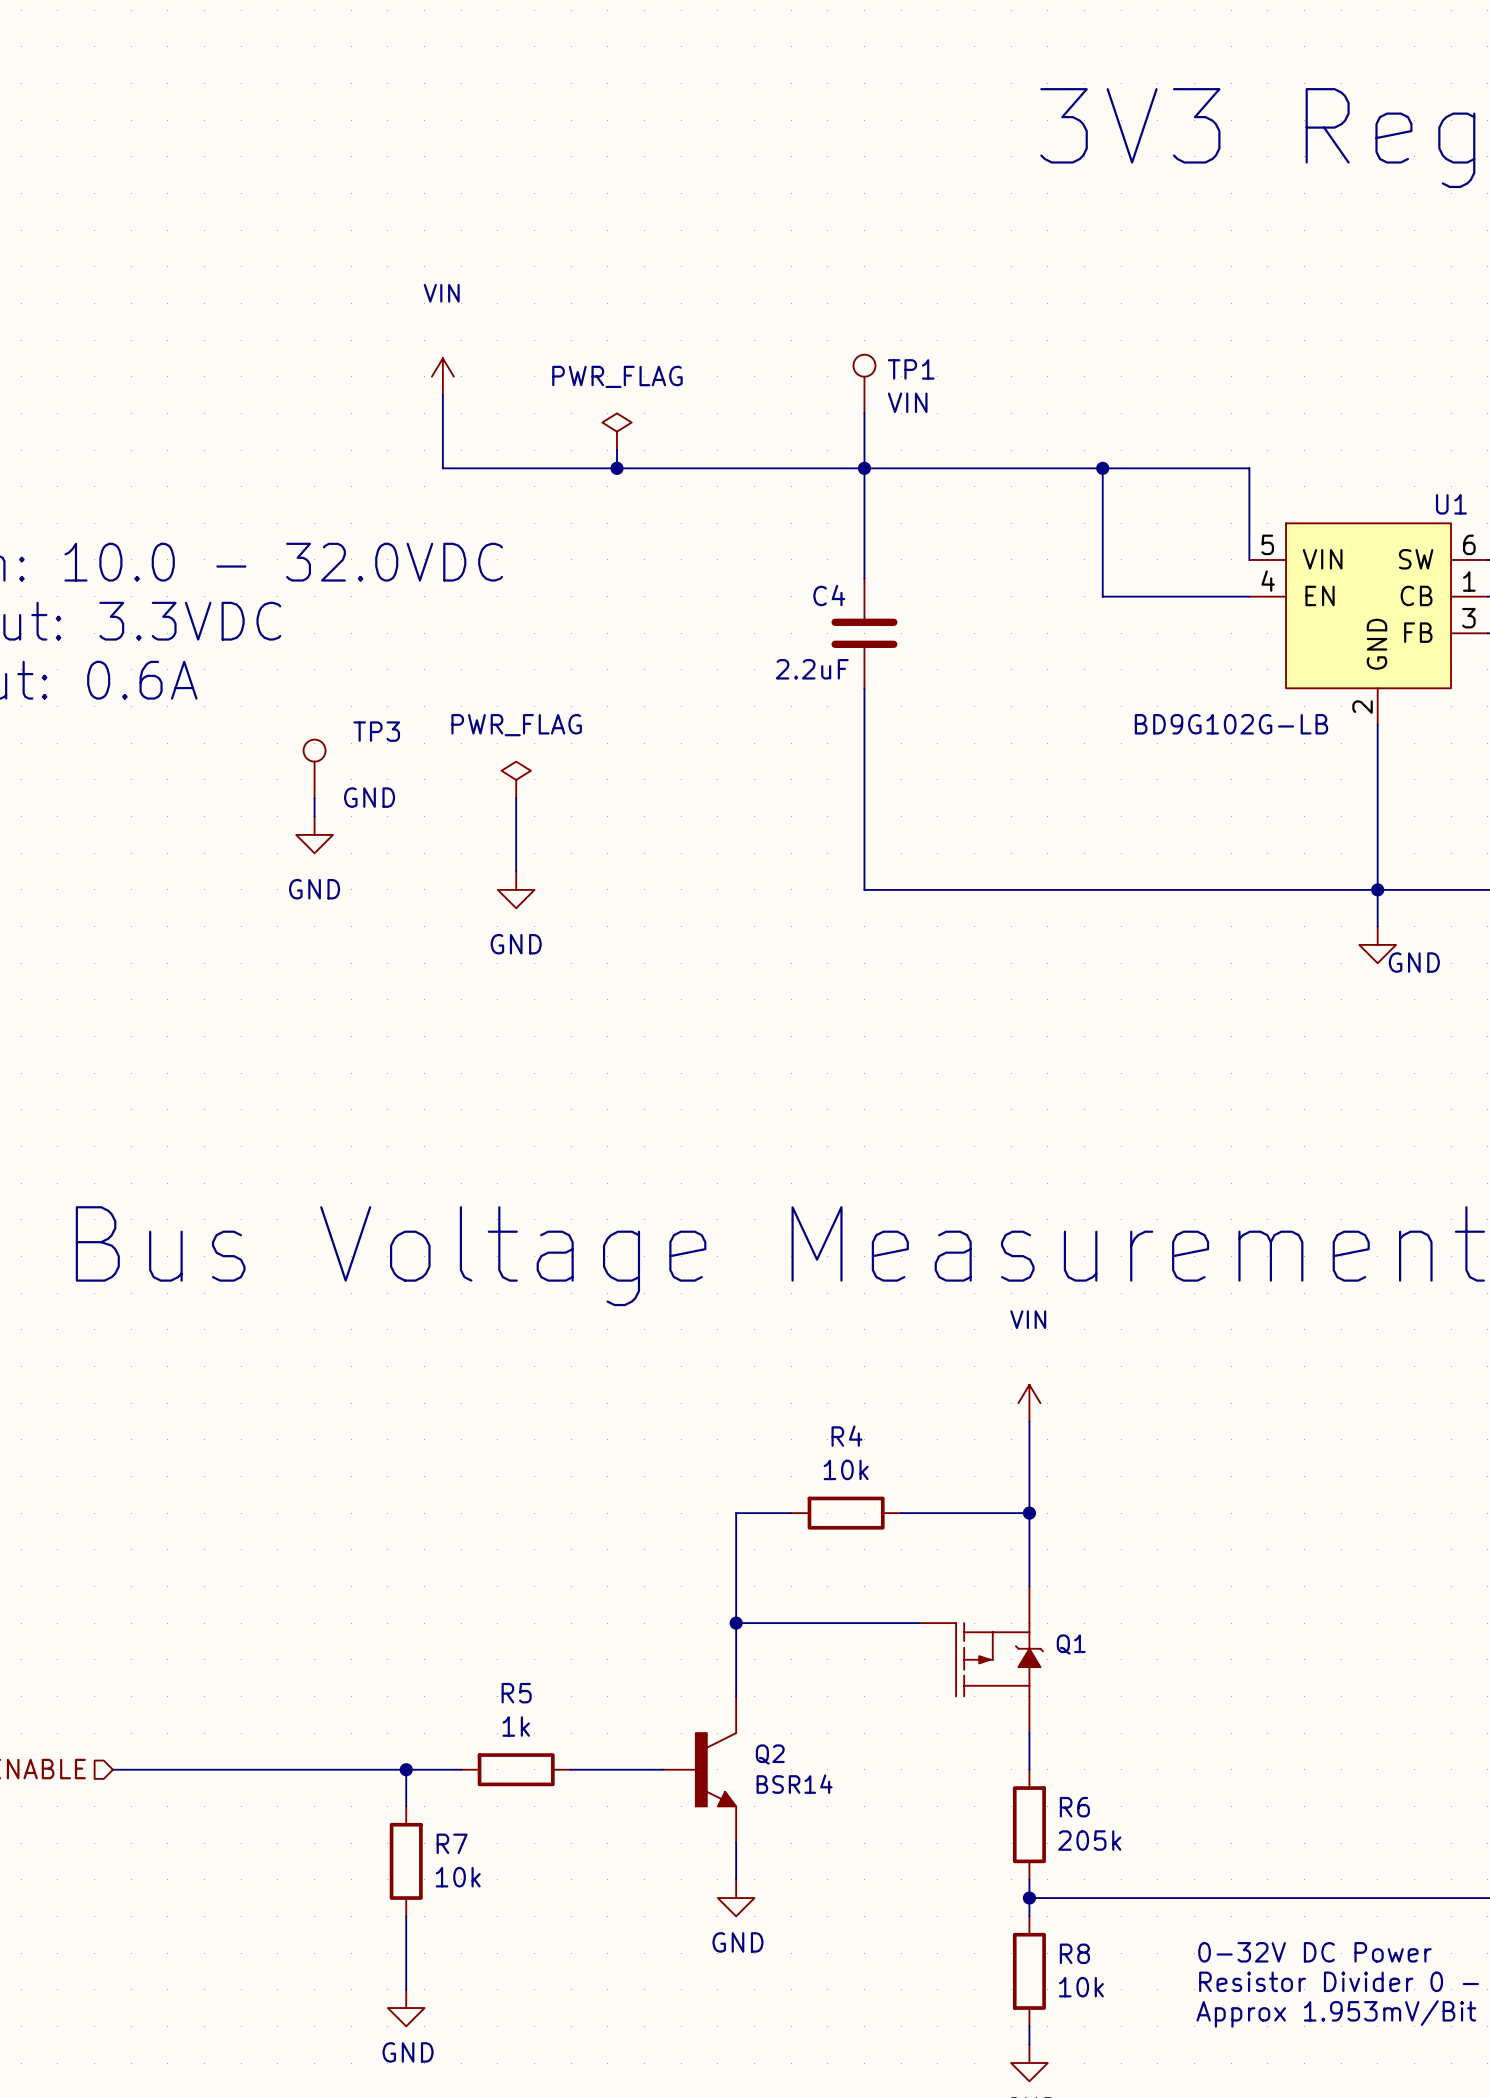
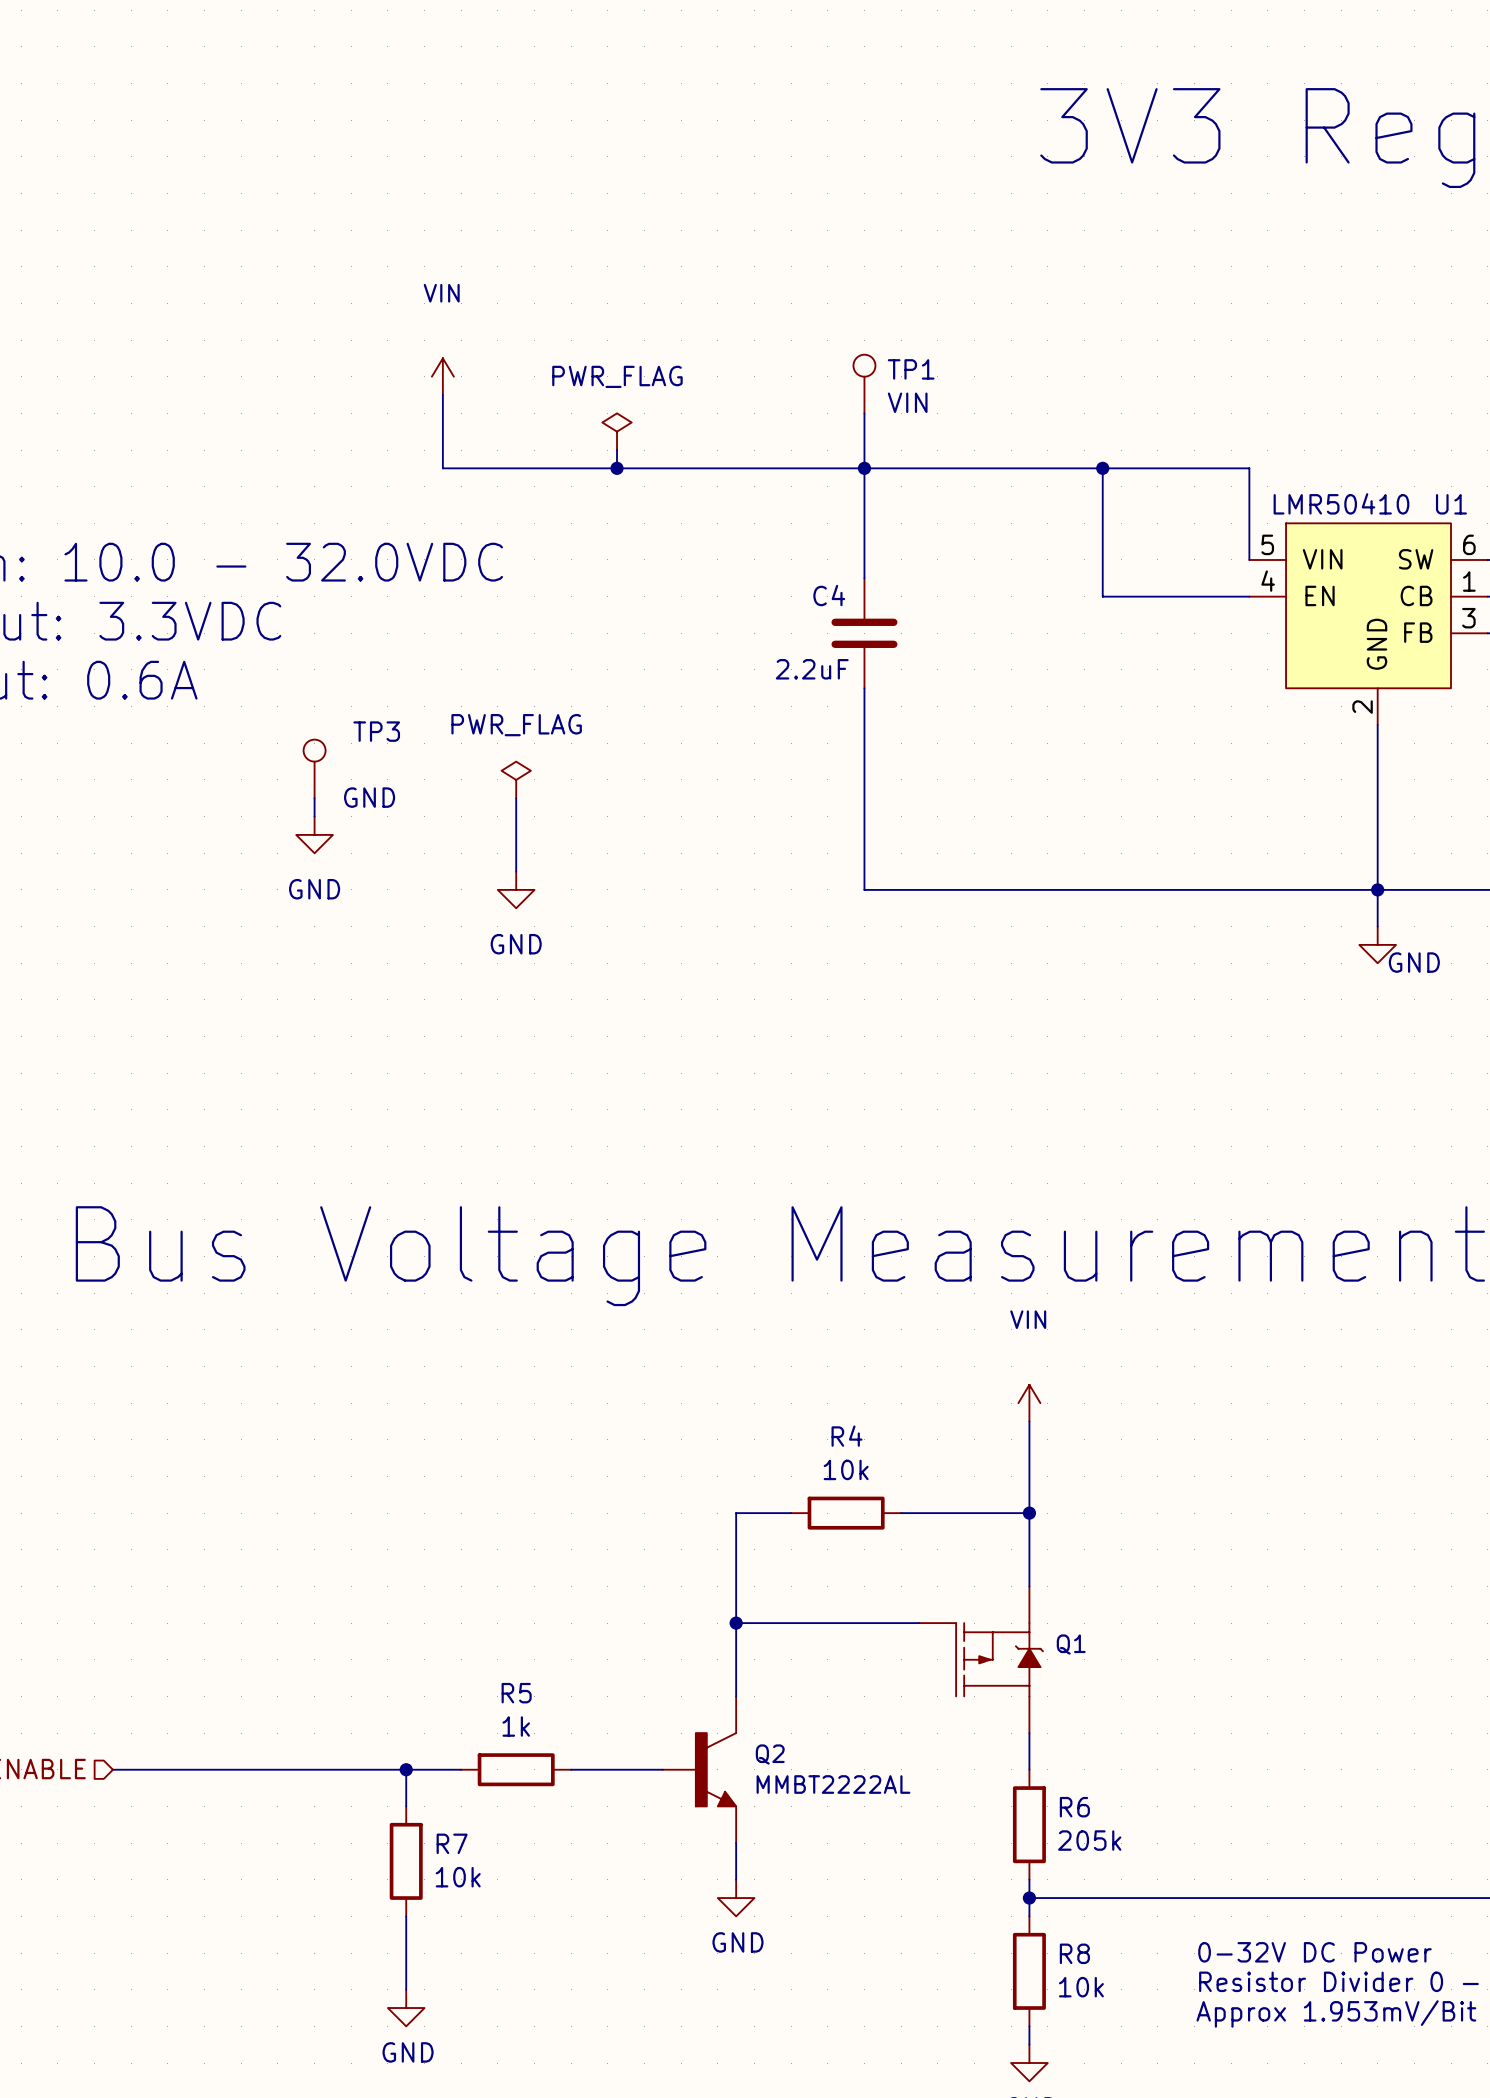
U1 value: BD9G102G-LB (1231, 724) -> LMR50410 (1341, 503)
Q2 value: BSR14 (794, 1784) -> MMBT2222AL (833, 1784)

